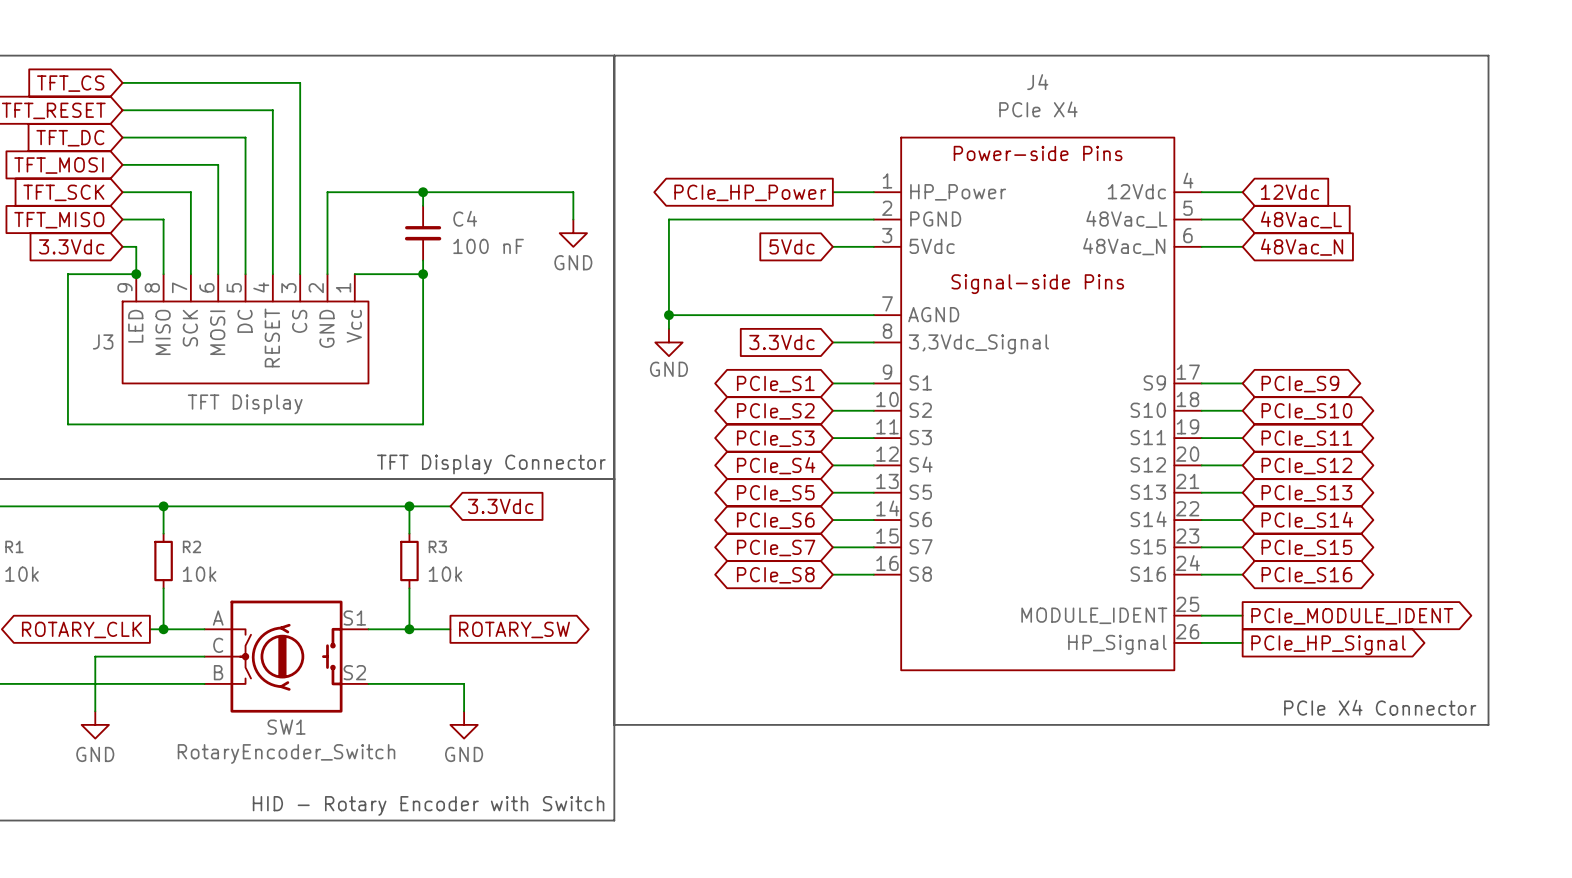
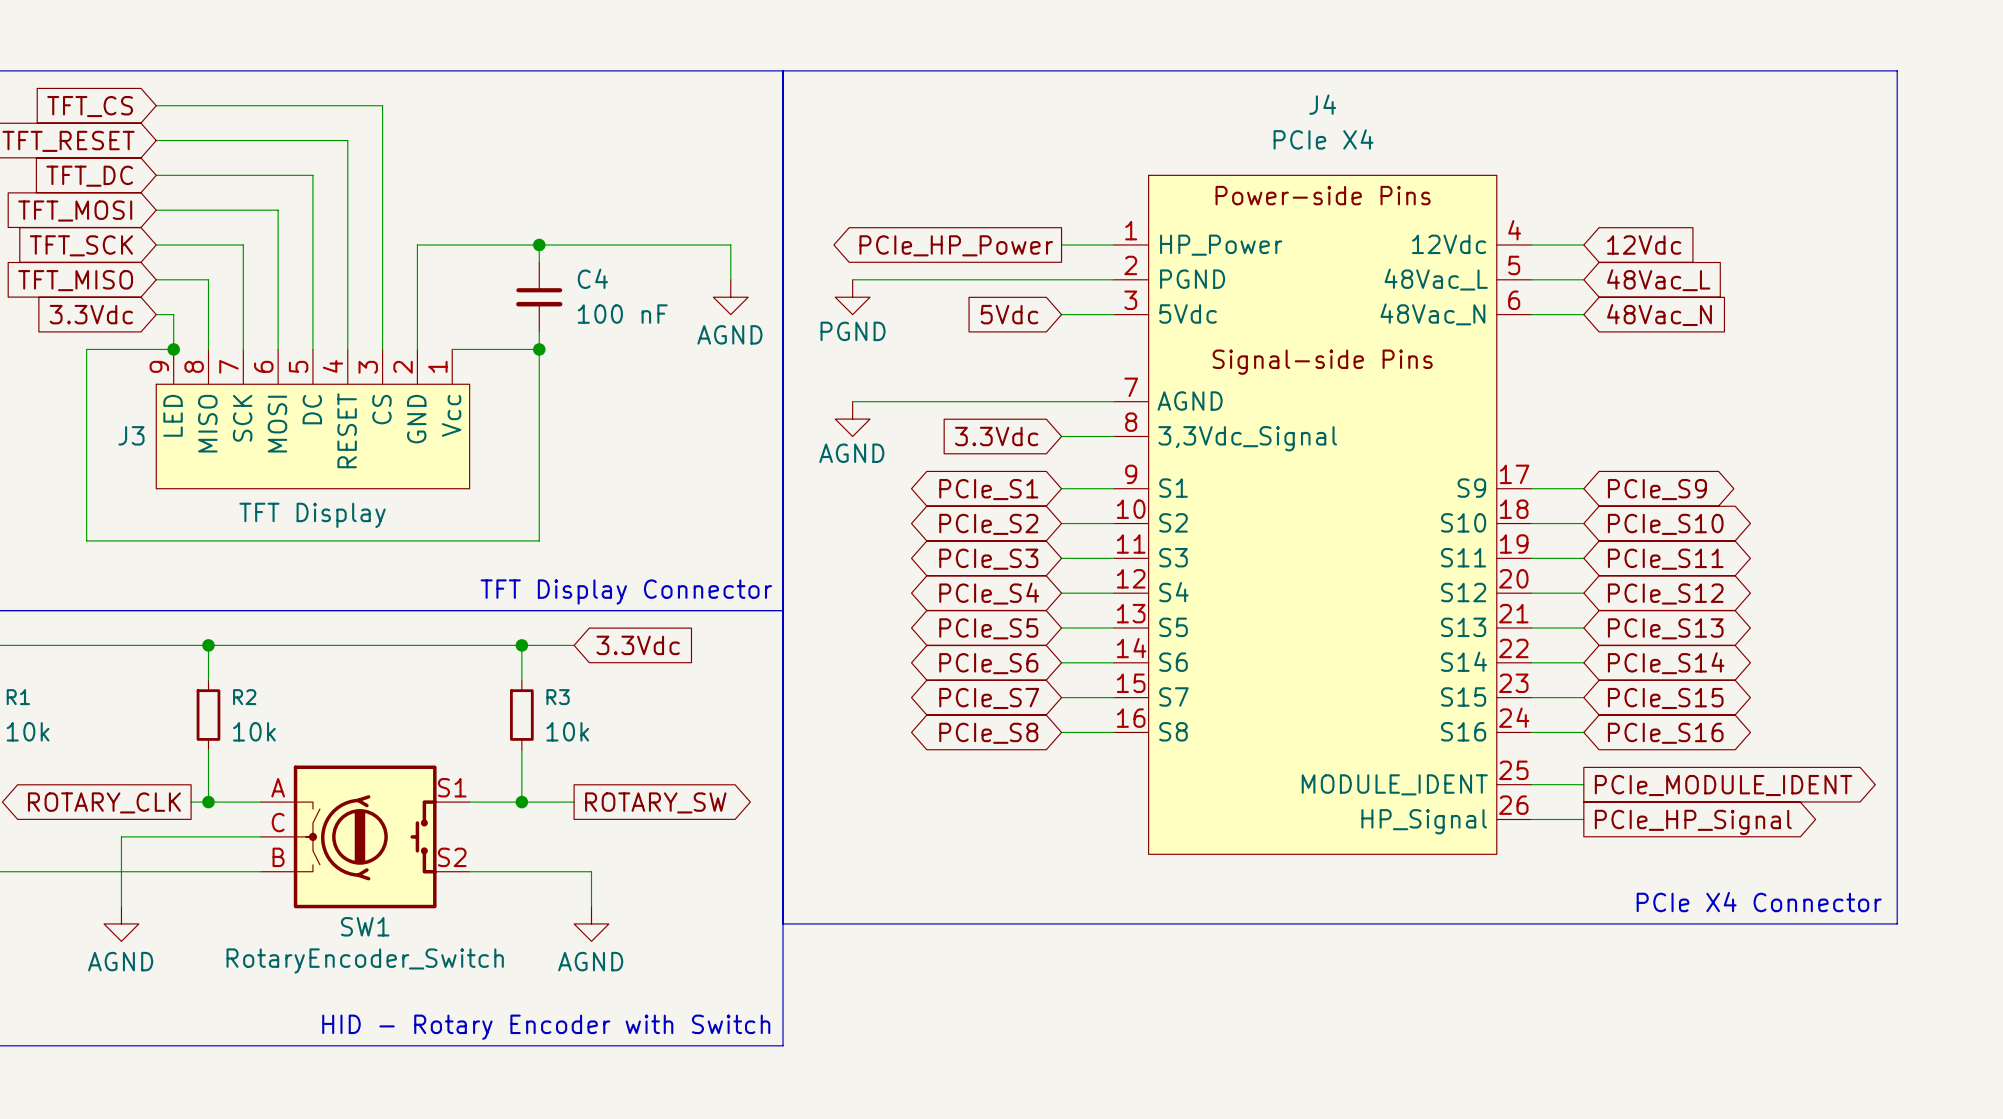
wire: (668, 219) (668, 328) -> none
power symbol: GND (573, 233) -> AGND (730, 297)
power symbol: none -> PGND (852, 297)
junction: (668, 315) -> none
power symbol: none -> AGND (852, 419)
power symbol: GND (668, 342) -> none
power symbol: GND (95, 724) -> AGND (121, 923)
power symbol: GND (464, 724) -> AGND (591, 923)

